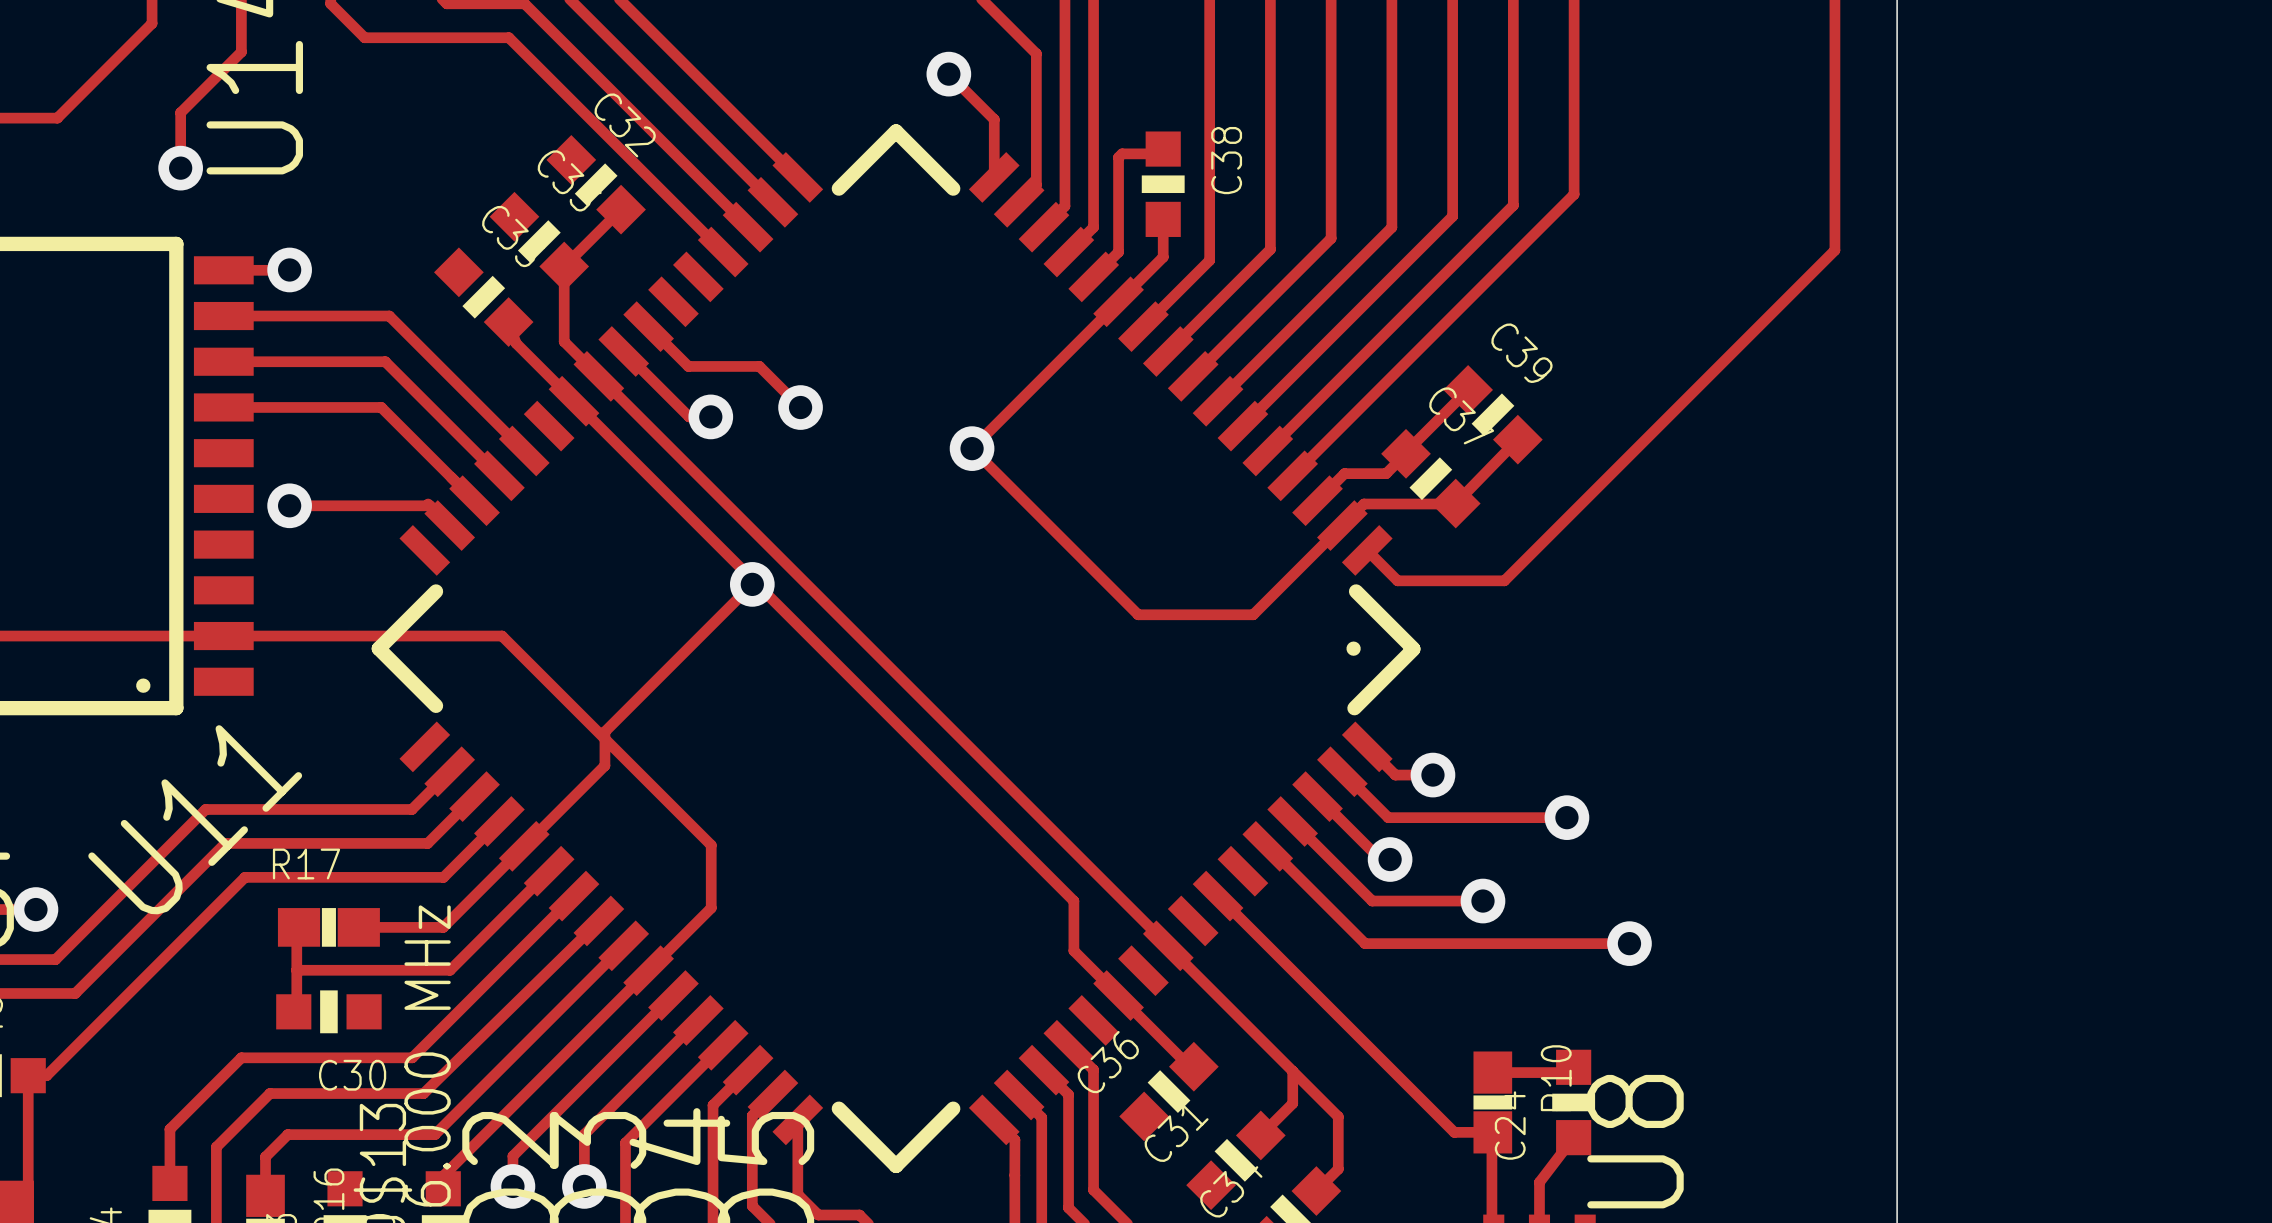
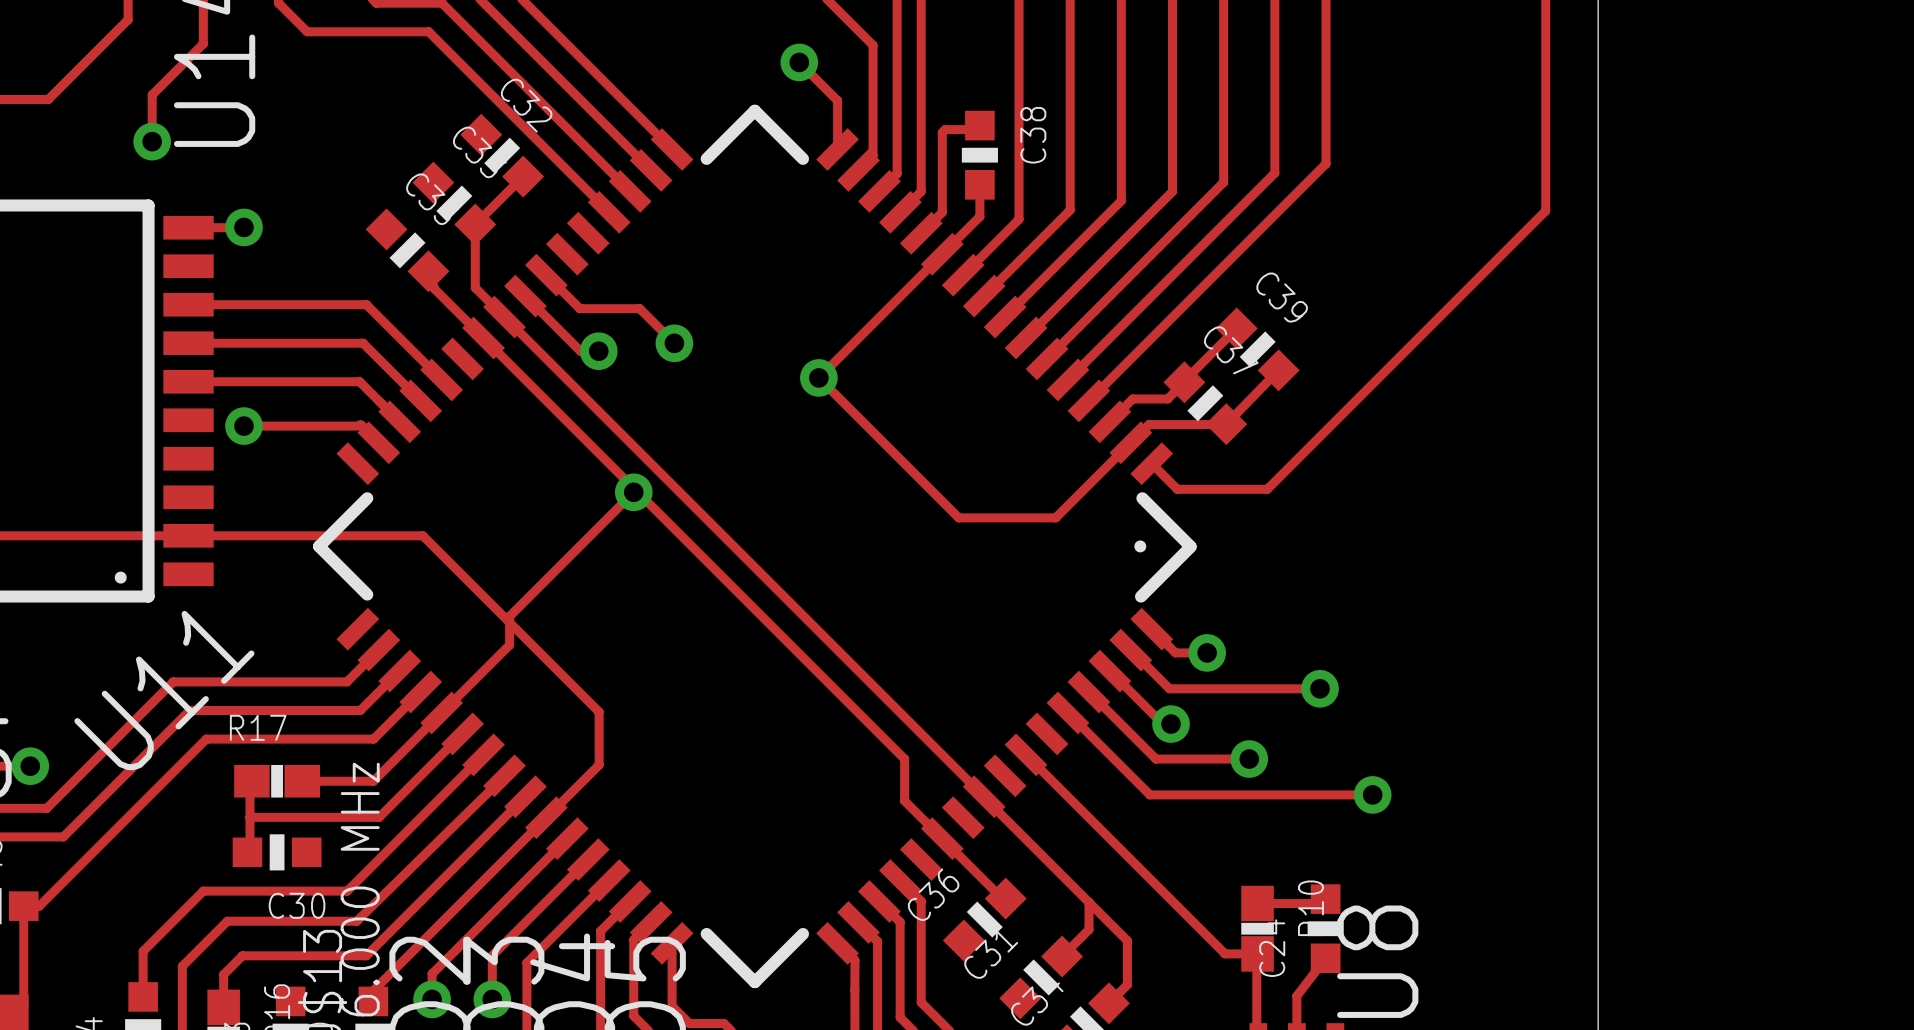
track: (223, 316) (389, 316) (435, 361) -> none
track: (385, 361) (431, 407) -> (324, 304) (366, 304)
track: (381, 407) (427, 453) -> (321, 343) (363, 343)
track: none -> (188, 381) (359, 381)

